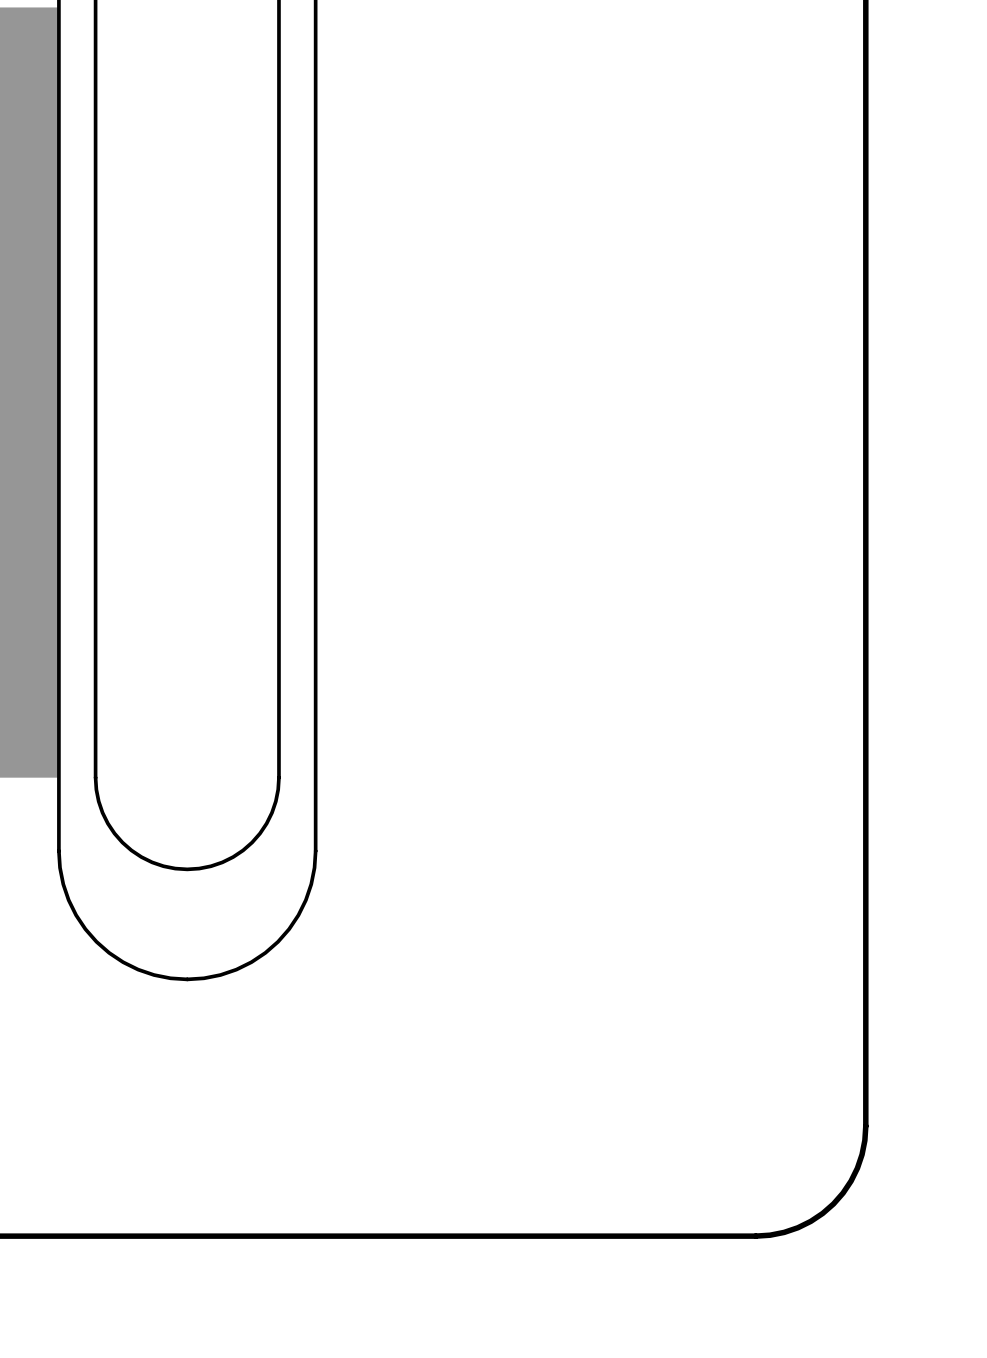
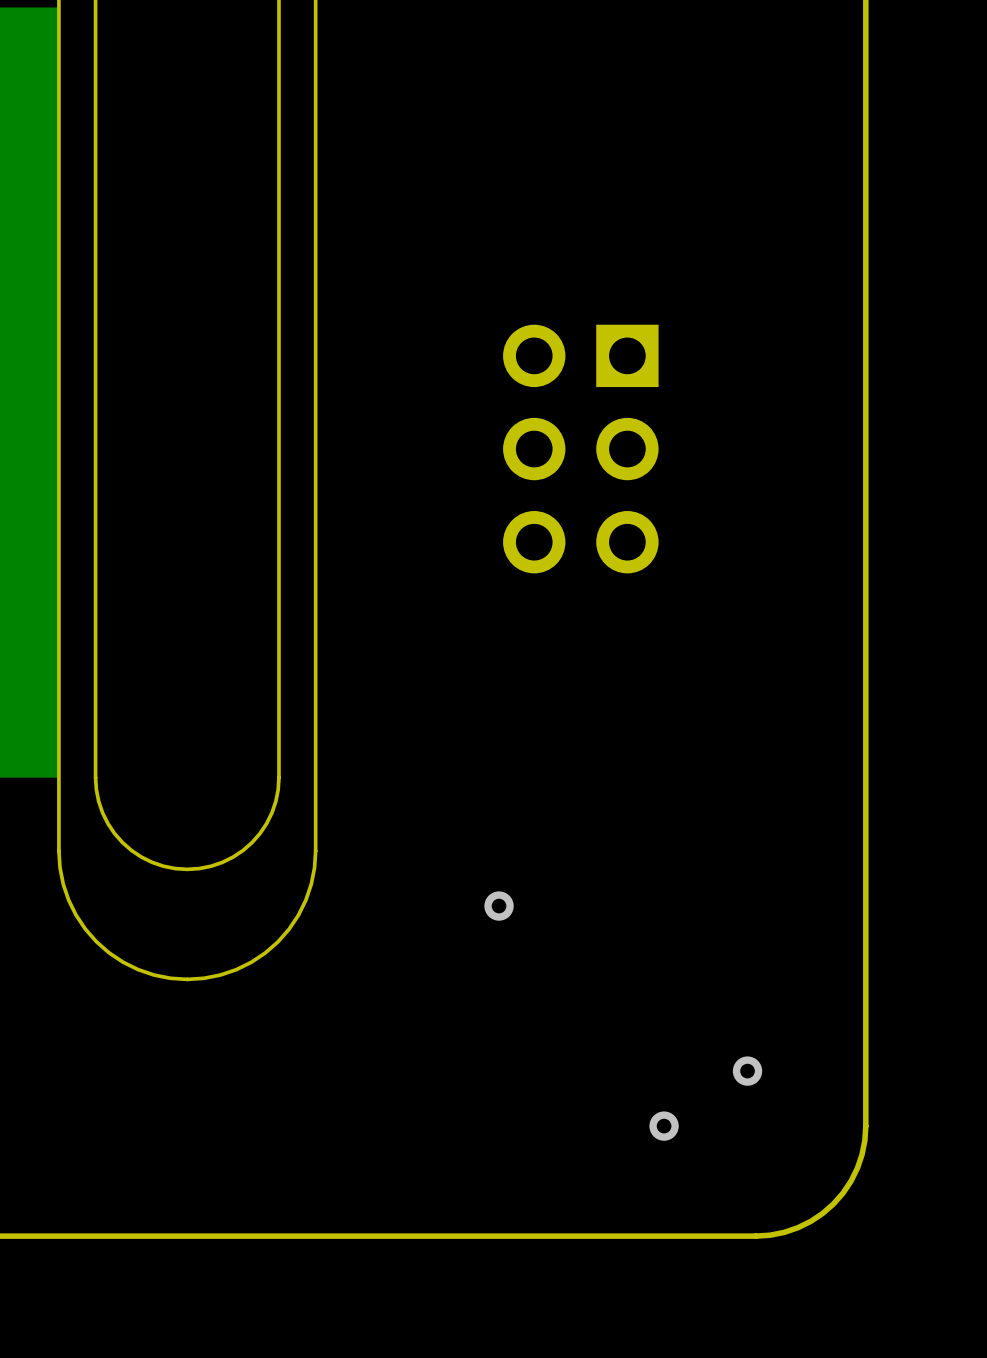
part: none -> (580, 449)
via: none -> (499, 906)
via: none -> (747, 1071)
via: none -> (664, 1126)

